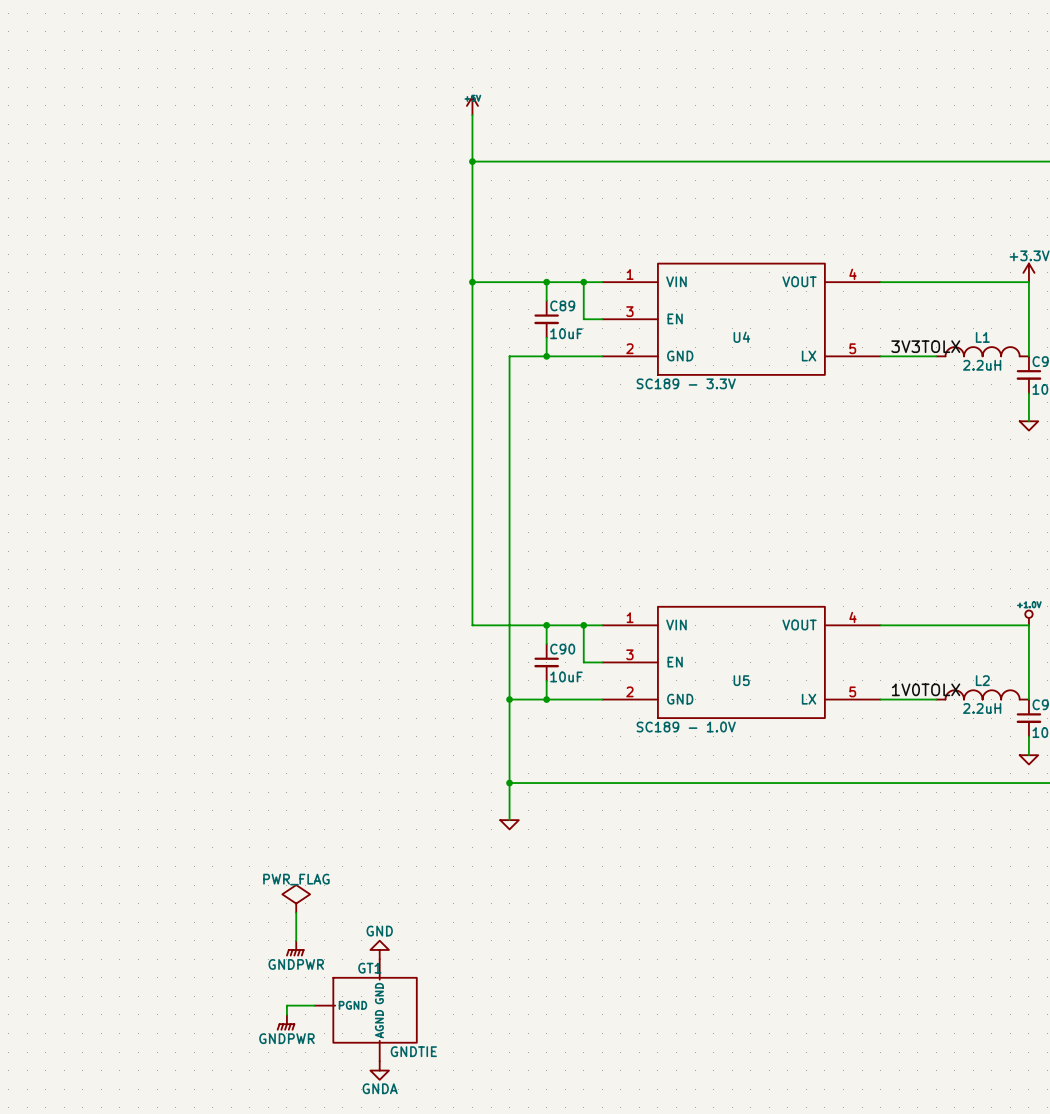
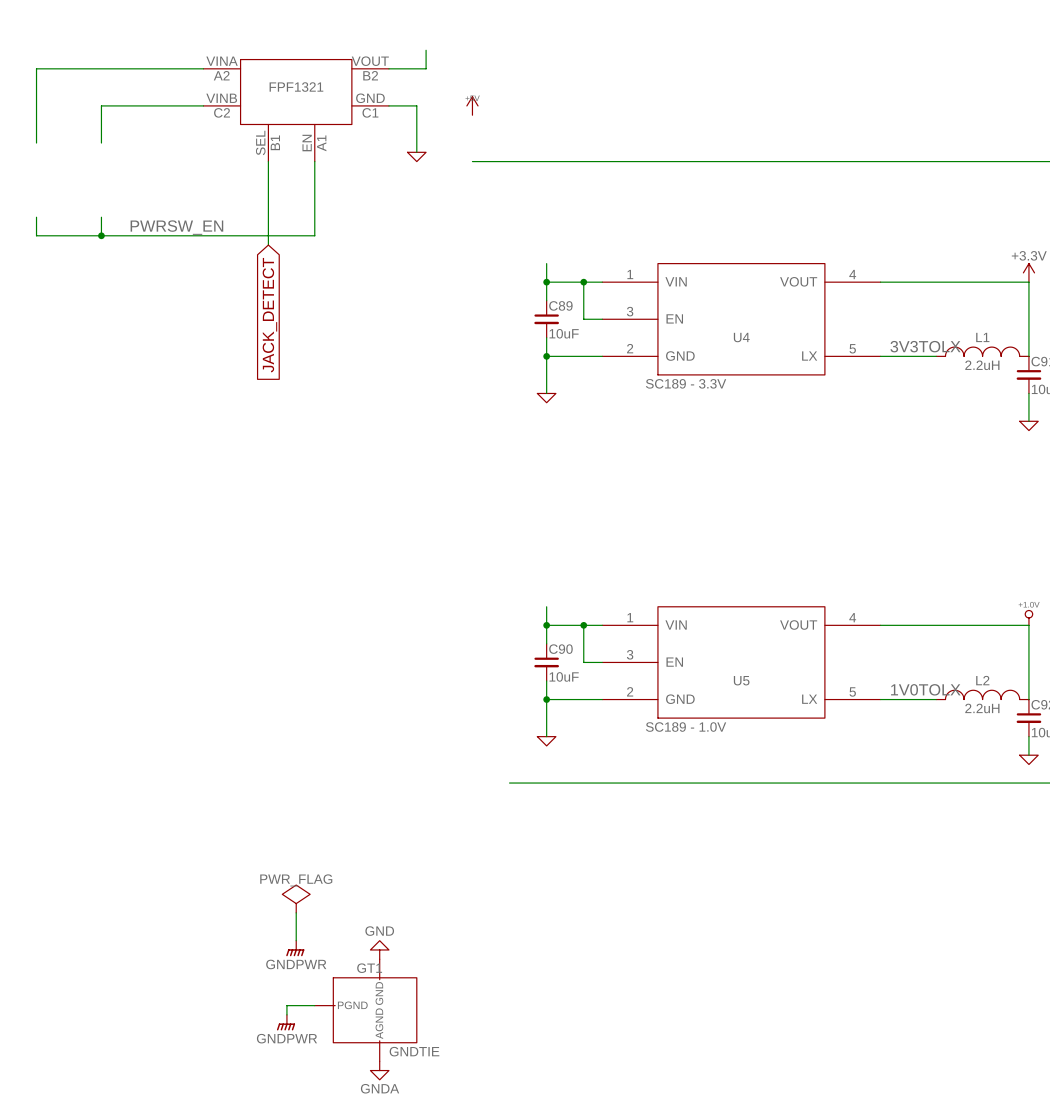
wire: none -> (426, 50) (426, 68) (388, 68)
wire: none -> (203, 68) (36, 68) (36, 143)
wire: none -> (203, 105) (101, 105) (101, 143)
wire: none -> (388, 105) (416, 105) (416, 152)
power symbol: none -> FPF1321 (296, 110)
wire: (472, 115) (472, 625) (546, 625) -> (546, 606) (546, 625)
power symbol: none -> (416, 156)
wire: none -> (268, 161) (268, 245)
wire: none -> (314, 161) (314, 235) (36, 235) (36, 217)
junction: (472, 161) -> none
wire: none -> (101, 217) (101, 235)
label: none -> PWRSW_EN (176, 227)
junction: none -> (101, 235)
wire: (472, 282) (546, 282) -> (546, 263) (546, 282)
junction: (472, 282) -> none
global label: none -> JACK_DETECT (269, 315)
wire: (546, 356) (509, 356) (509, 820) -> (546, 356) (546, 393)
power symbol: none -> (546, 398)
wire: (509, 699) (546, 699) -> (546, 736) (546, 699)
junction: (509, 699) -> none
junction: (509, 783) -> none
power symbol position: (509, 824) -> (546, 741)

